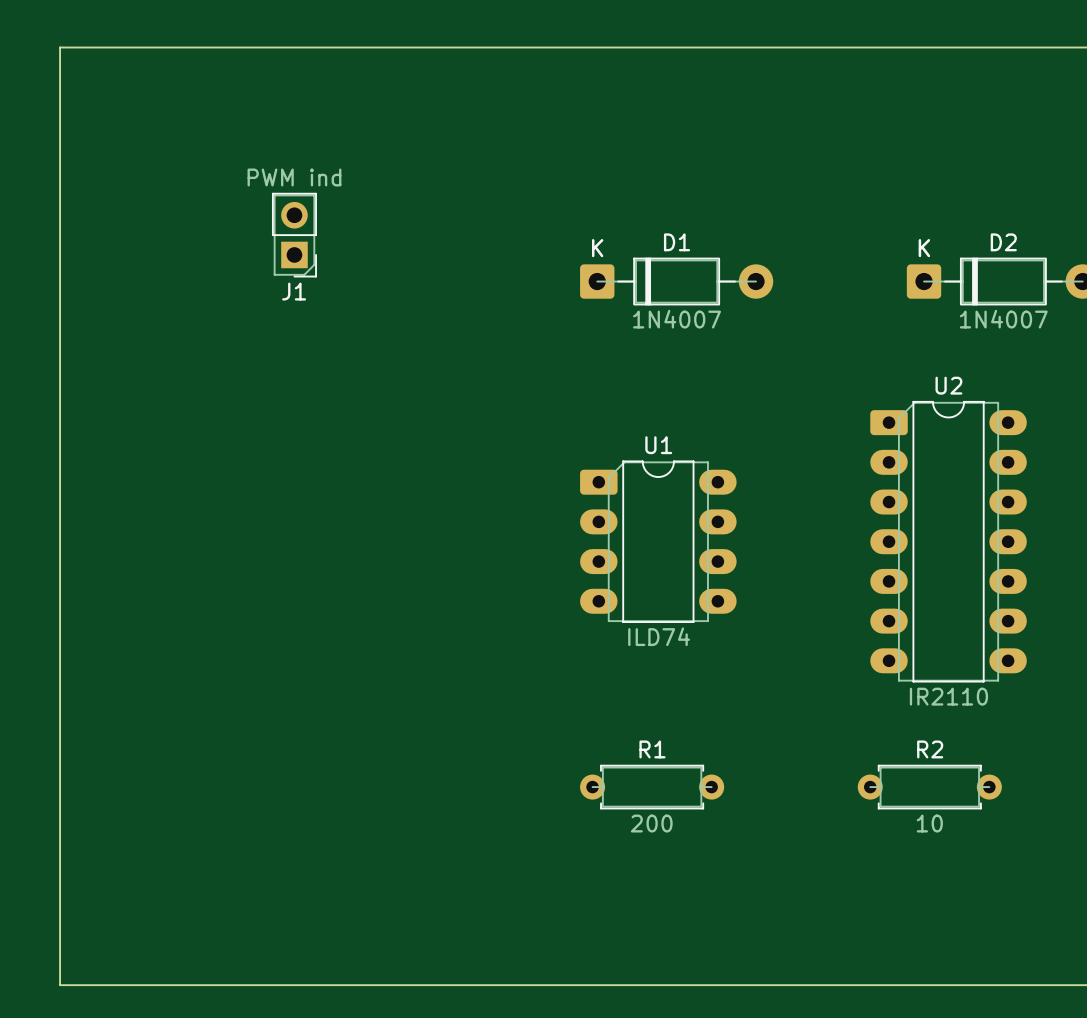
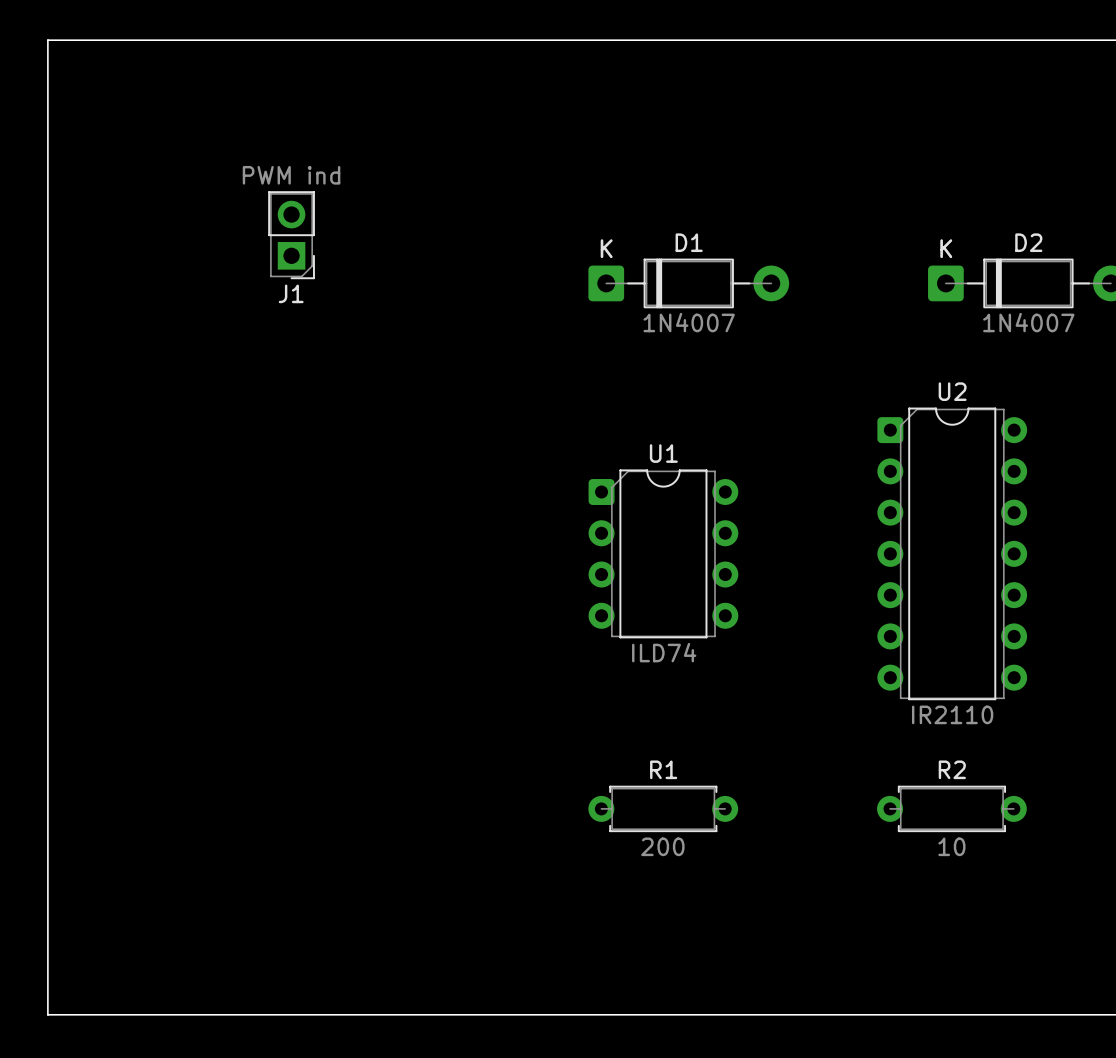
U2 footprint: [870, 400, 1027, 683] -> [877, 407, 1028, 701]
U1 footprint: [580, 460, 737, 623] -> [588, 469, 739, 639]

